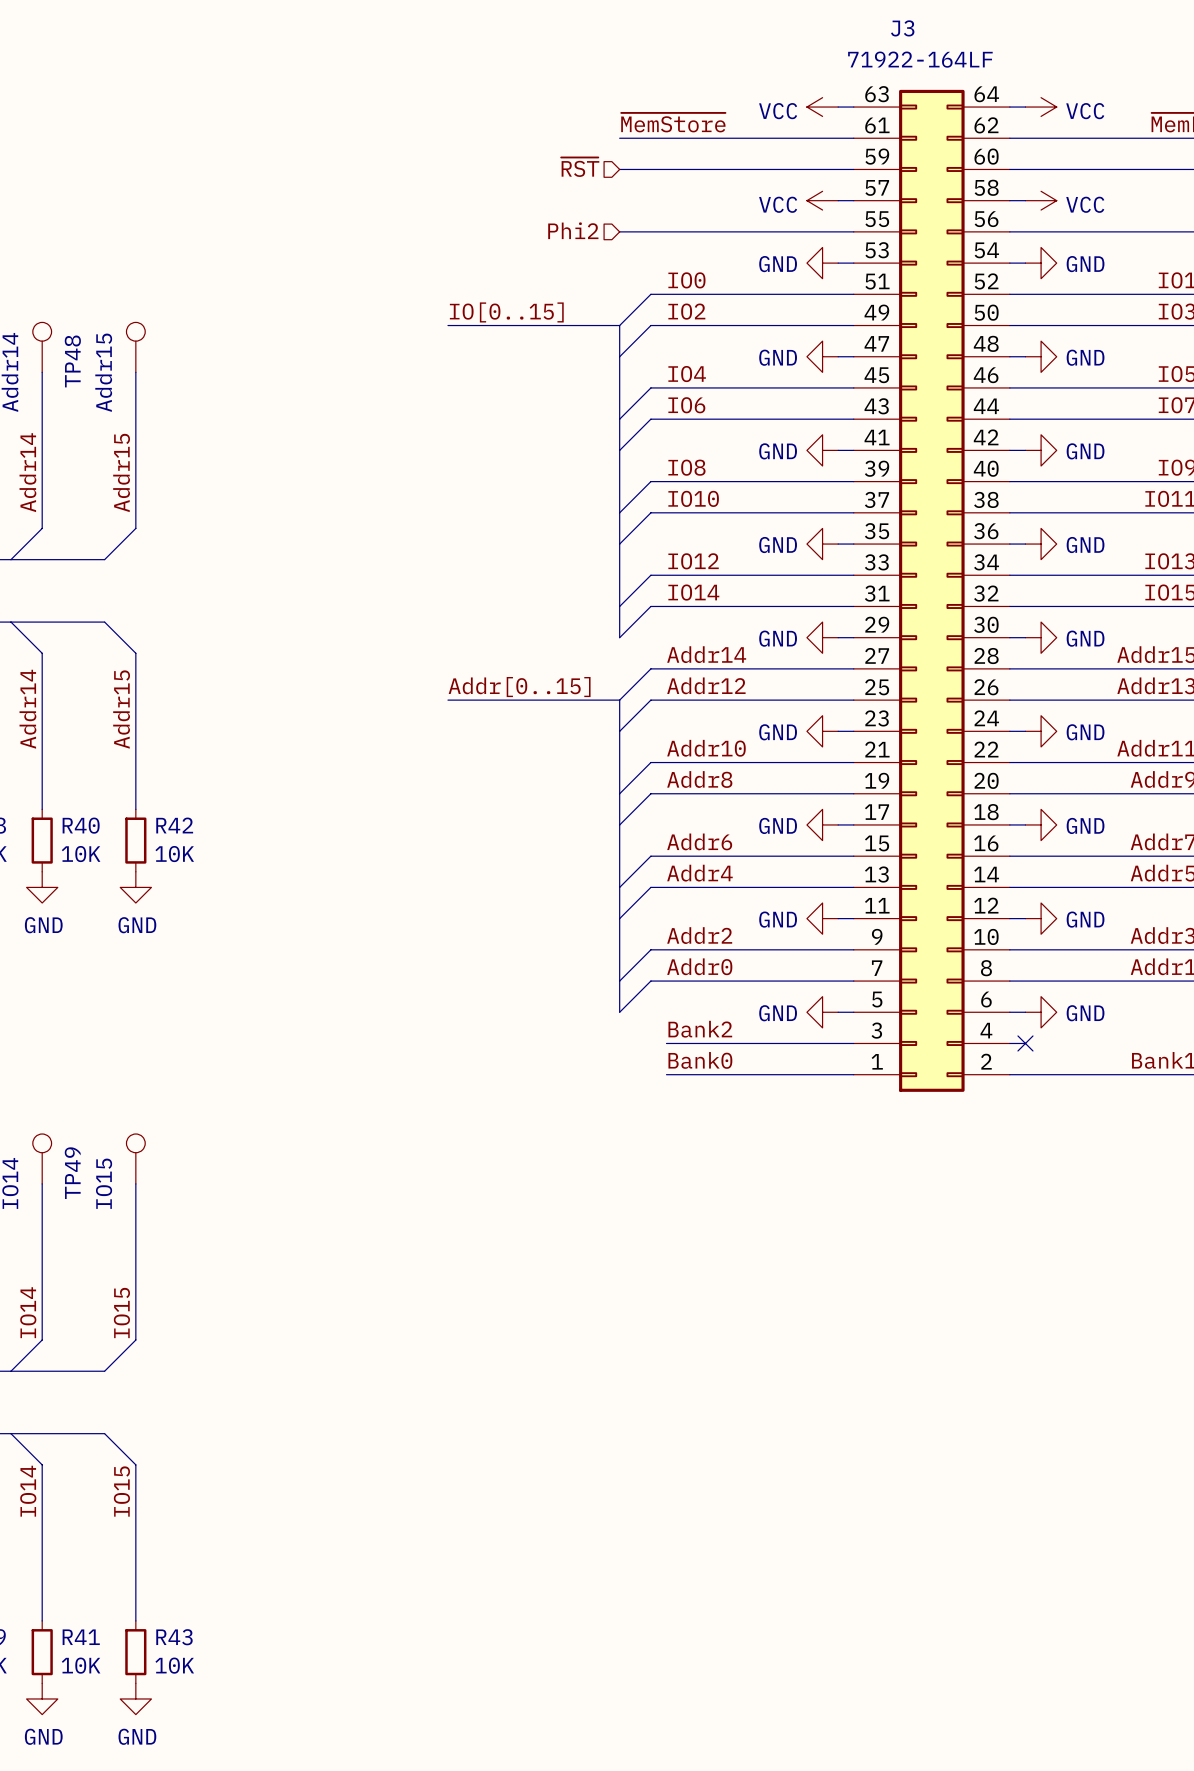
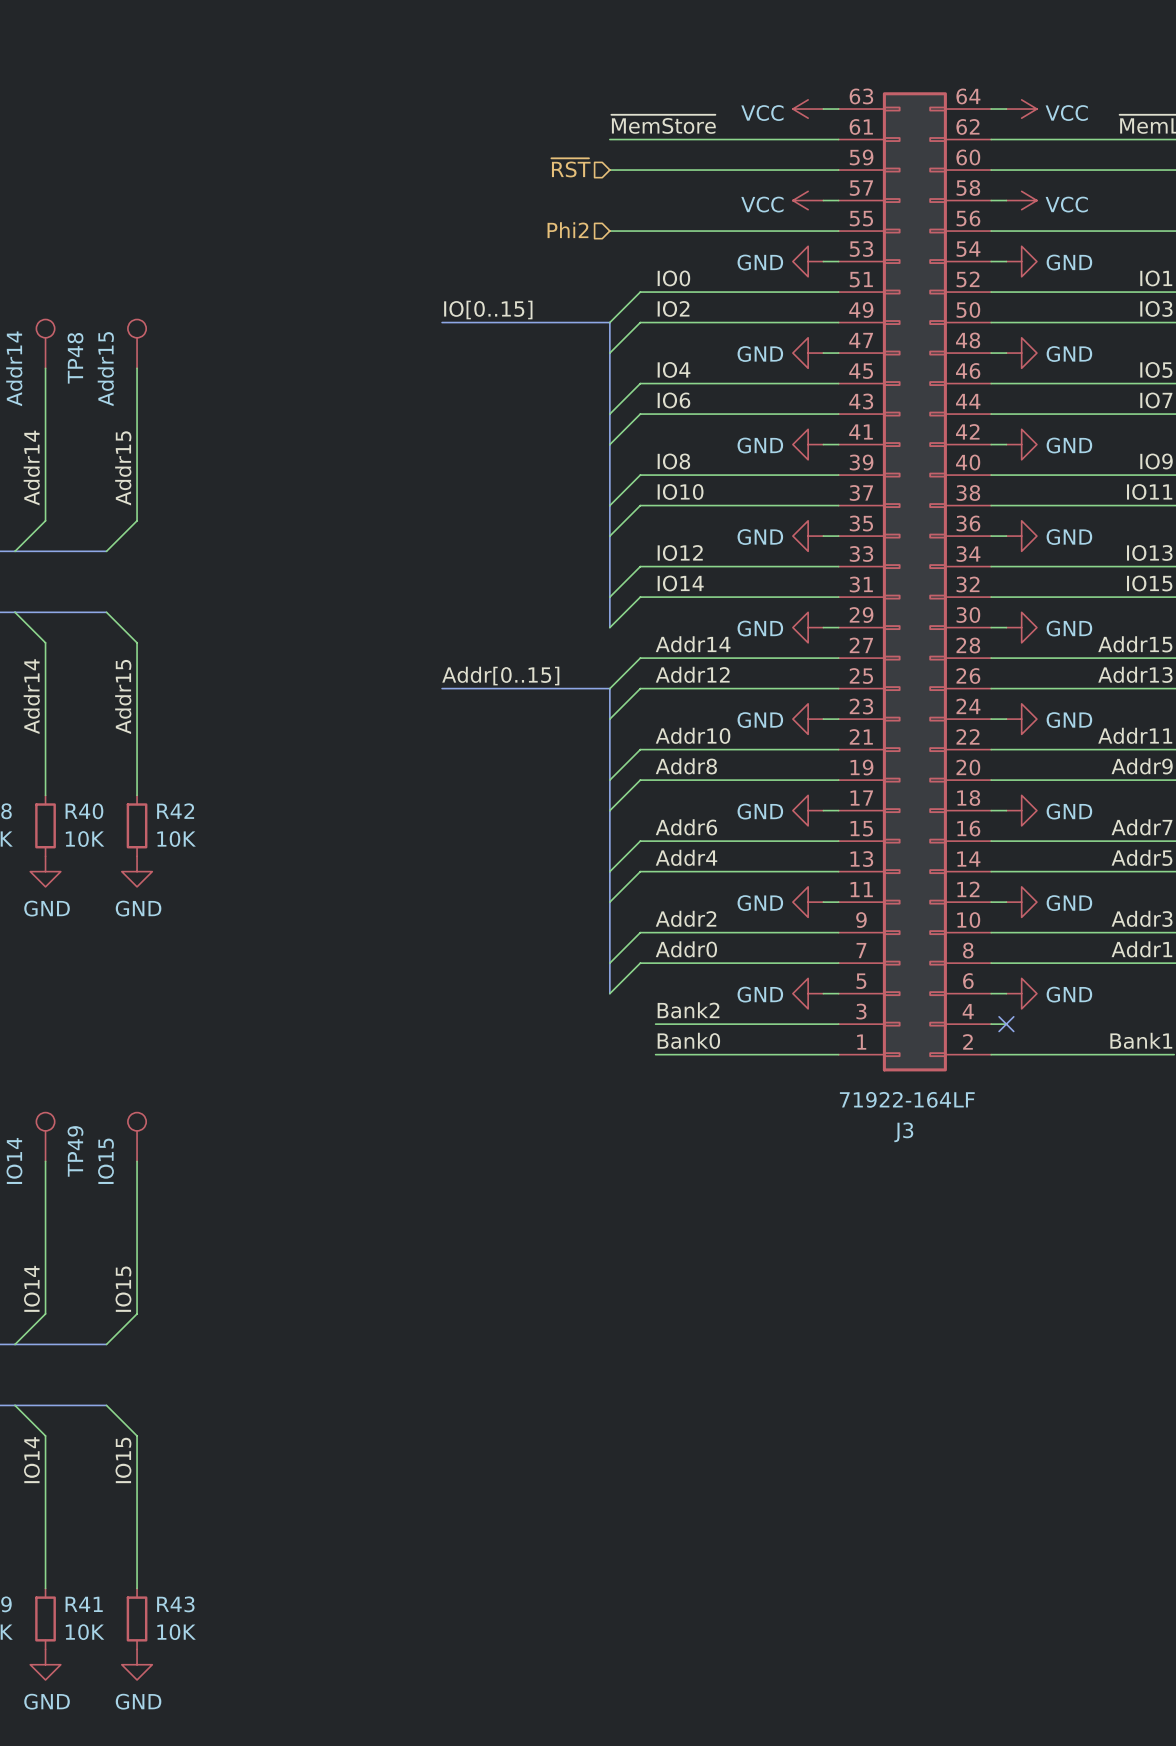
J3 name position: J3 (902, 28) -> J3 (903, 1132)
J3 value position: 71922-164LF (920, 59) -> 71922-164LF (907, 1099)

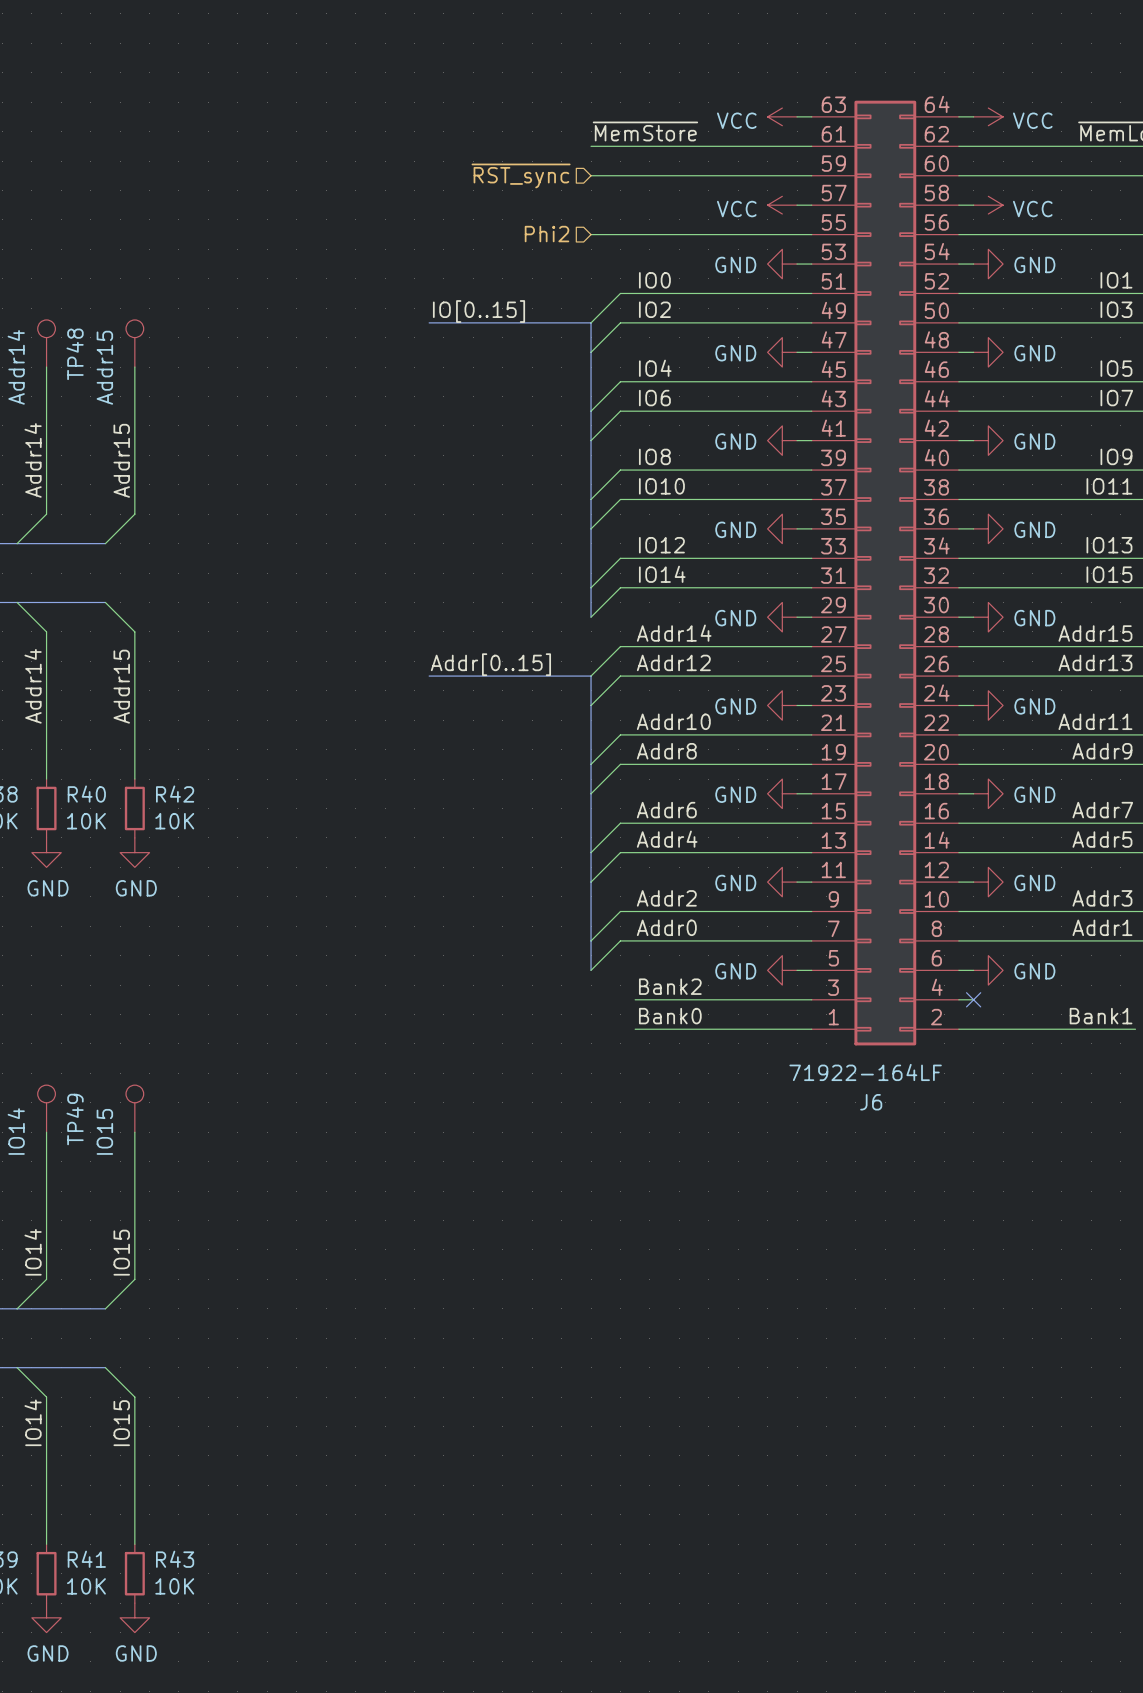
hierarchical label: ~{RST} (570, 167) -> ~{RST_sync} (521, 175)
J3 name: J3 (903, 1132) -> J6 (871, 1102)

